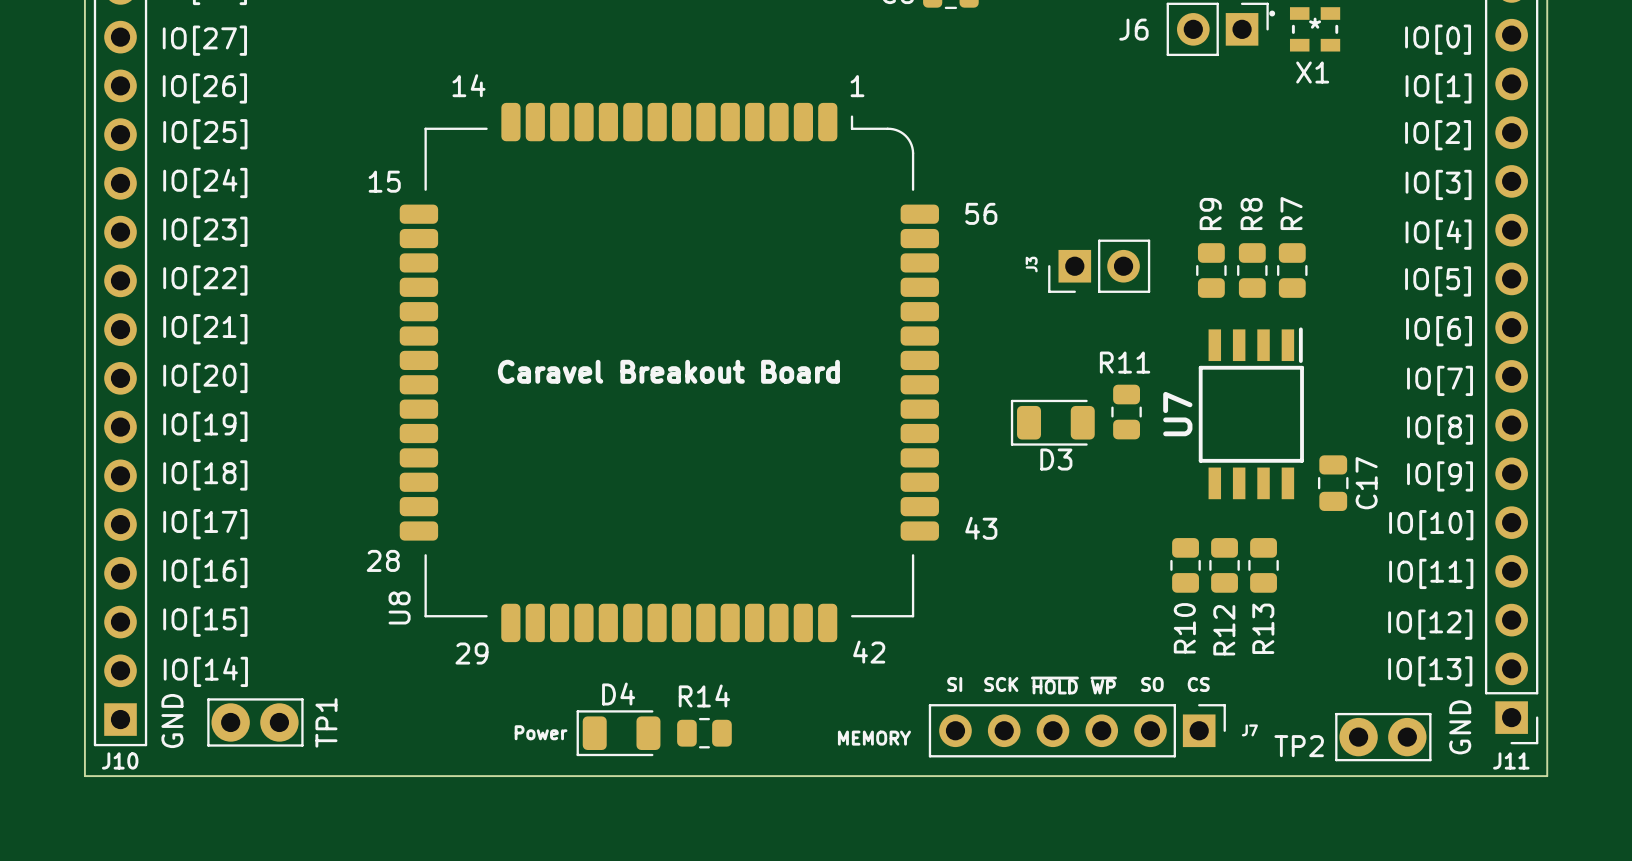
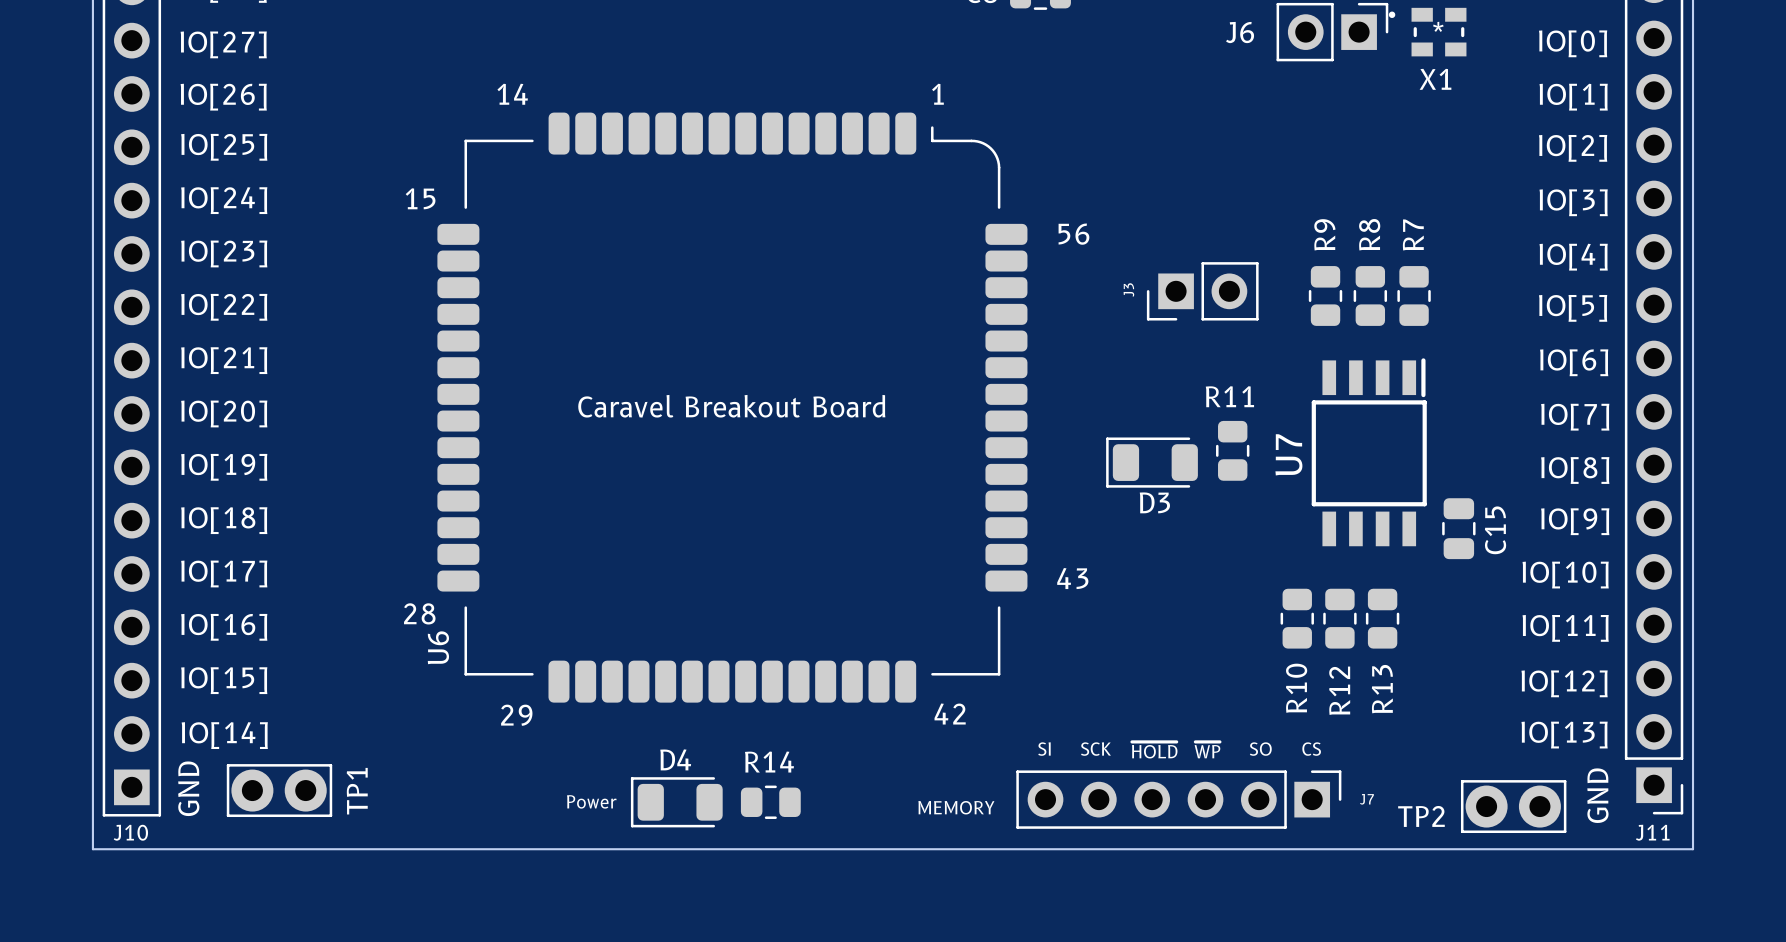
C17 name: C17 (1366, 483) -> C15 (1495, 530)
U8 name: U8 (399, 607) -> U6 (438, 647)

